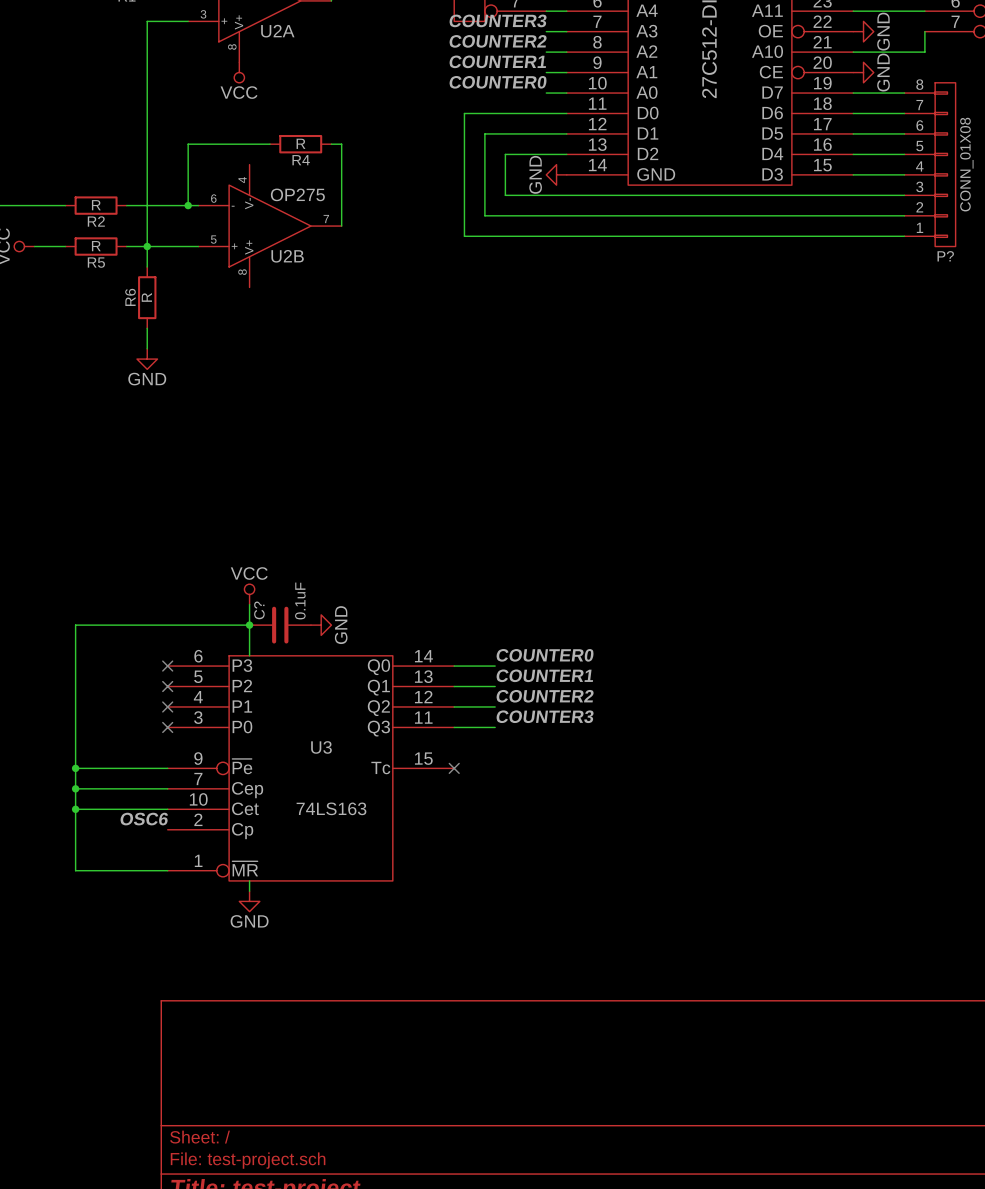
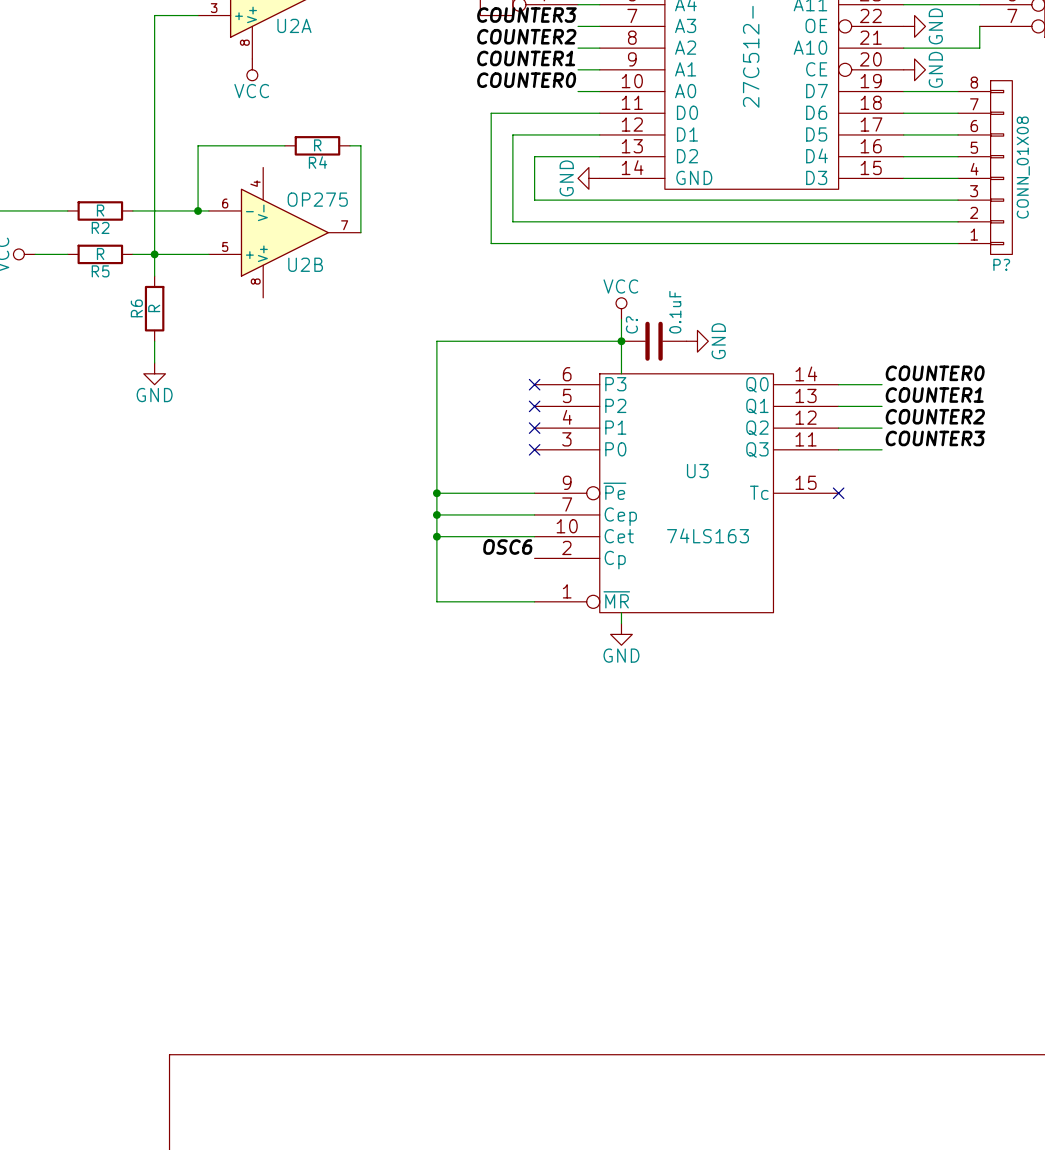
power symbol: none -> VCC (621, 308)
wire: none -> (621, 319) (621, 373)
wire: none -> (621, 341) (436, 341) (436, 601) (534, 601)
junction: none -> (621, 341)
C?: none -> 0.1uF (654, 341)
power symbol: none -> GND (697, 341)
label: none -> COUNTER0 (935, 373)
no-connect mark: none -> (534, 384)
wire: none -> (838, 384) (882, 384)
label: none -> COUNTER1 (934, 395)
no-connect mark: none -> (534, 406)
wire: none -> (838, 406) (882, 406)
label: none -> COUNTER2 (935, 416)
no-connect mark: none -> (534, 428)
wire: none -> (838, 428) (882, 428)
label: none -> COUNTER3 (935, 438)
no-connect mark: none -> (534, 449)
wire: none -> (838, 449) (882, 449)
wire: none -> (436, 493) (534, 493)
junction: none -> (436, 493)
no-connect mark: none -> (838, 493)
wire: none -> (436, 514) (534, 514)
junction: none -> (436, 514)
wire: none -> (436, 536) (534, 536)
junction: none -> (436, 536)
label: none -> OSC6 (507, 547)
wire: none -> (621, 612) (621, 623)
power symbol: VCC (249, 594) -> none
wire: (249, 604) (249, 655) -> none
power symbol: none -> GND (621, 634)
wire: (249, 625) (75, 625) (75, 870) (167, 870) -> none
junction: (249, 625) -> none
C?: 0.1uF (280, 625) -> none
power symbol: GND (321, 625) -> none
label: COUNTER0 (545, 655) -> none
no-connect mark: (167, 666) -> none
wire: (454, 666) (495, 666) -> none
label: COUNTER1 (544, 675) -> none
no-connect mark: (167, 686) -> none
wire: (454, 686) (495, 686) -> none
label: COUNTER2 (545, 696) -> none
no-connect mark: (167, 706) -> none
wire: (454, 706) (495, 706) -> none
label: COUNTER3 (544, 716) -> none
no-connect mark: (167, 727) -> none
wire: (454, 727) (495, 727) -> none
wire: (75, 768) (167, 768) -> none
junction: (75, 768) -> none
U3 position: (310, 768) -> (686, 493)
no-connect mark: (454, 768) -> none
wire: (75, 788) (167, 788) -> none
junction: (75, 788) -> none
wire: (75, 809) (167, 809) -> none
junction: (75, 809) -> none
label: OSC6 (144, 819) -> none
wire: (249, 880) (249, 891) -> none
power symbol: GND (249, 901) -> none

